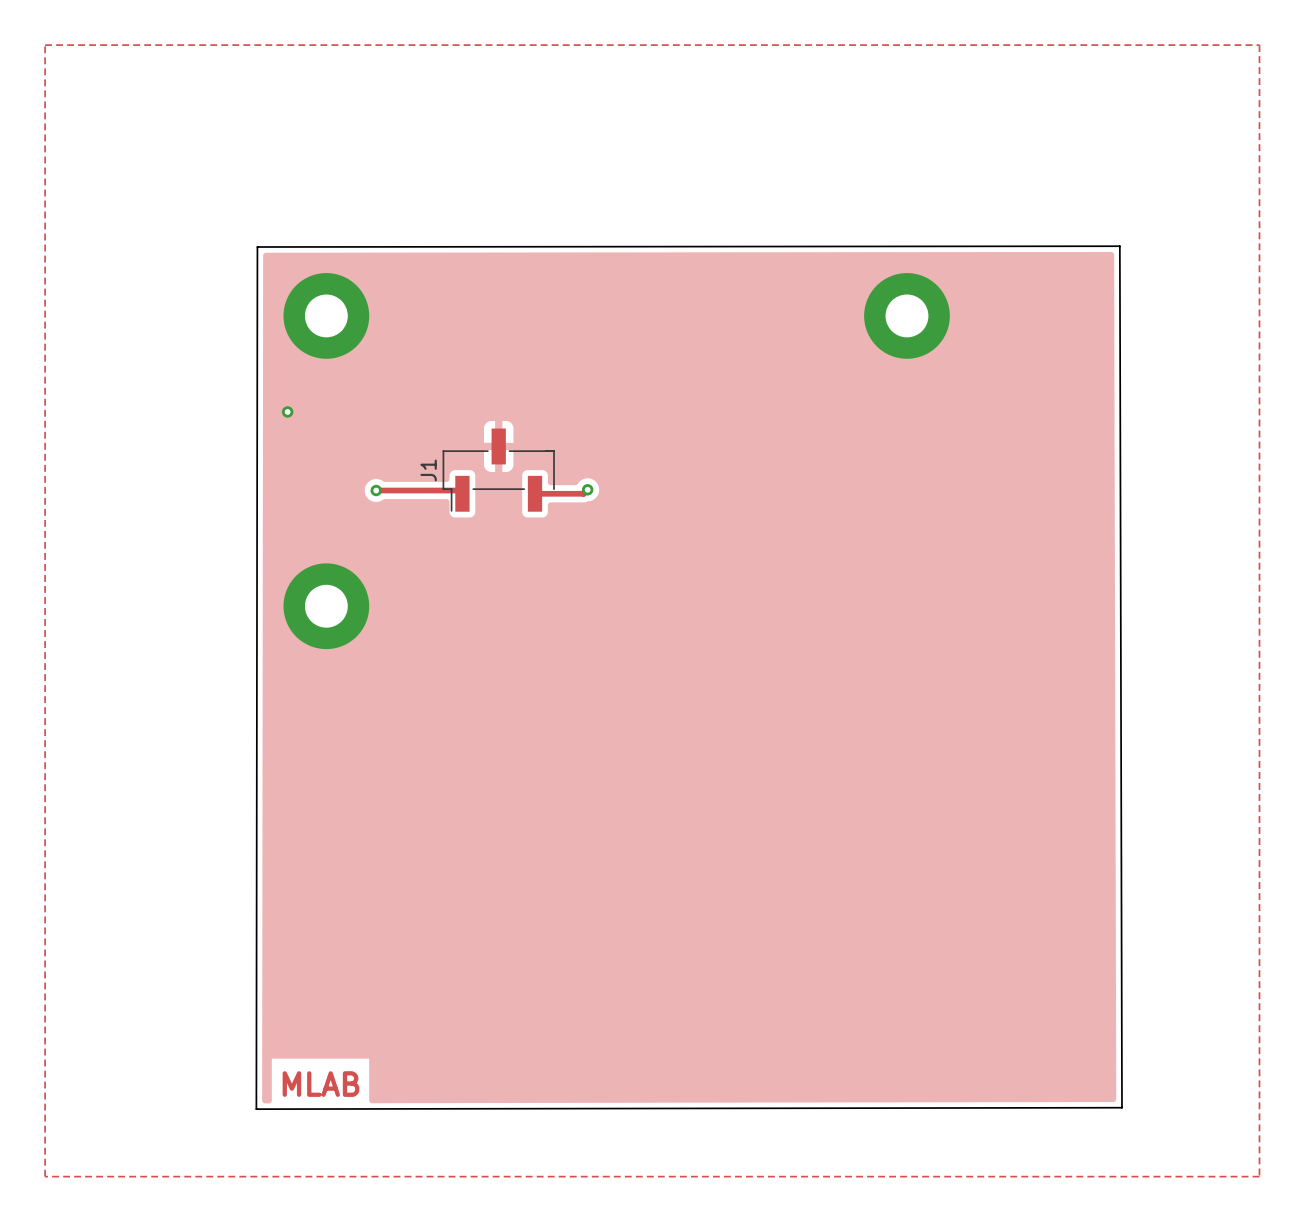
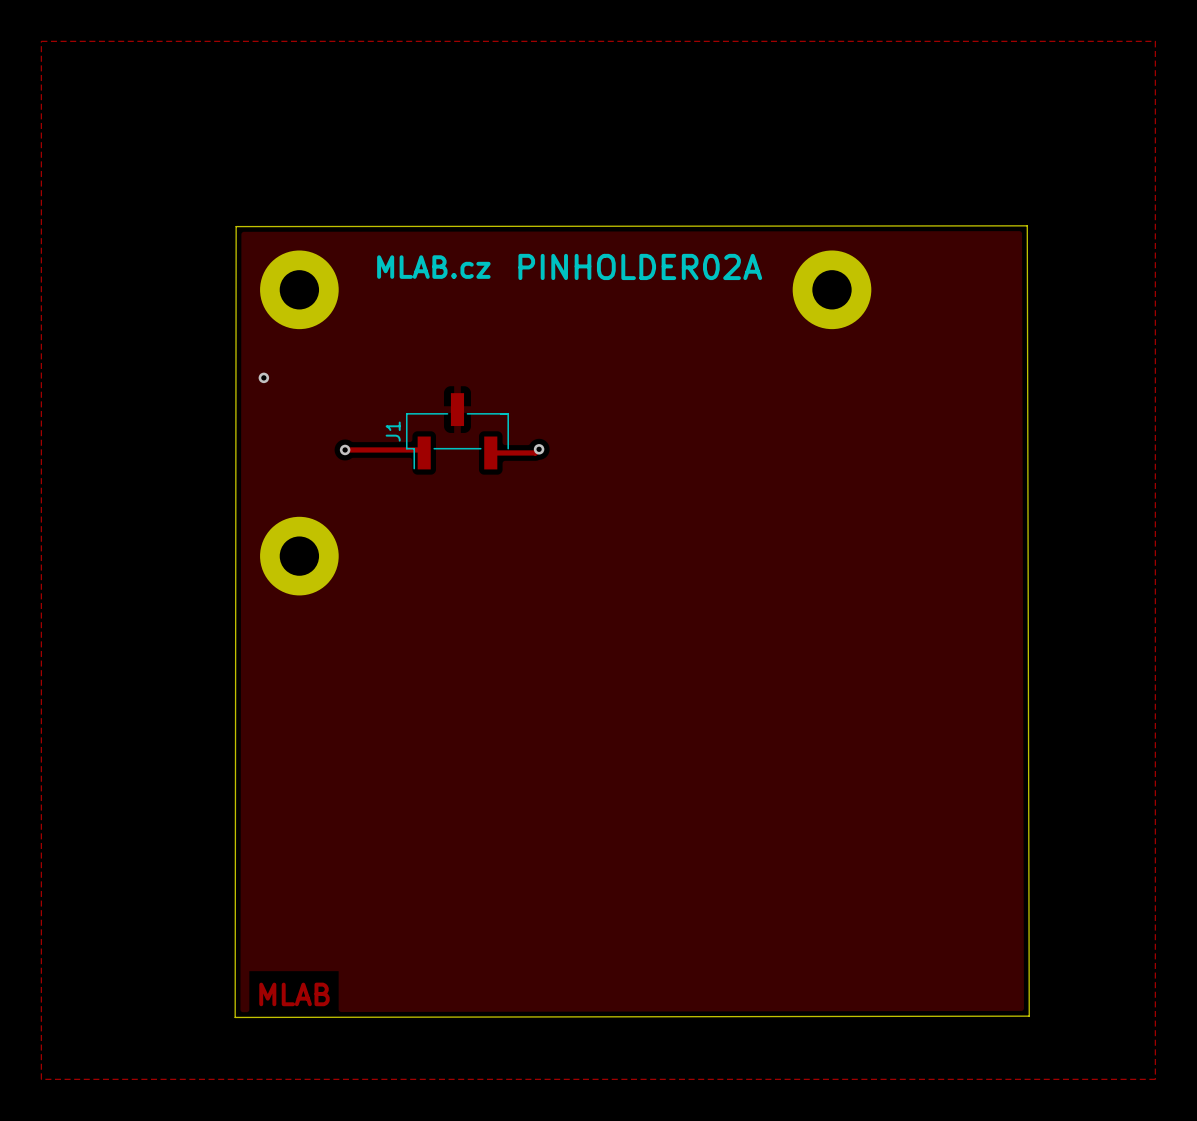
text: none -> MLAB.cz (433, 267)
text: none -> PINHOLDER02A (640, 266)

